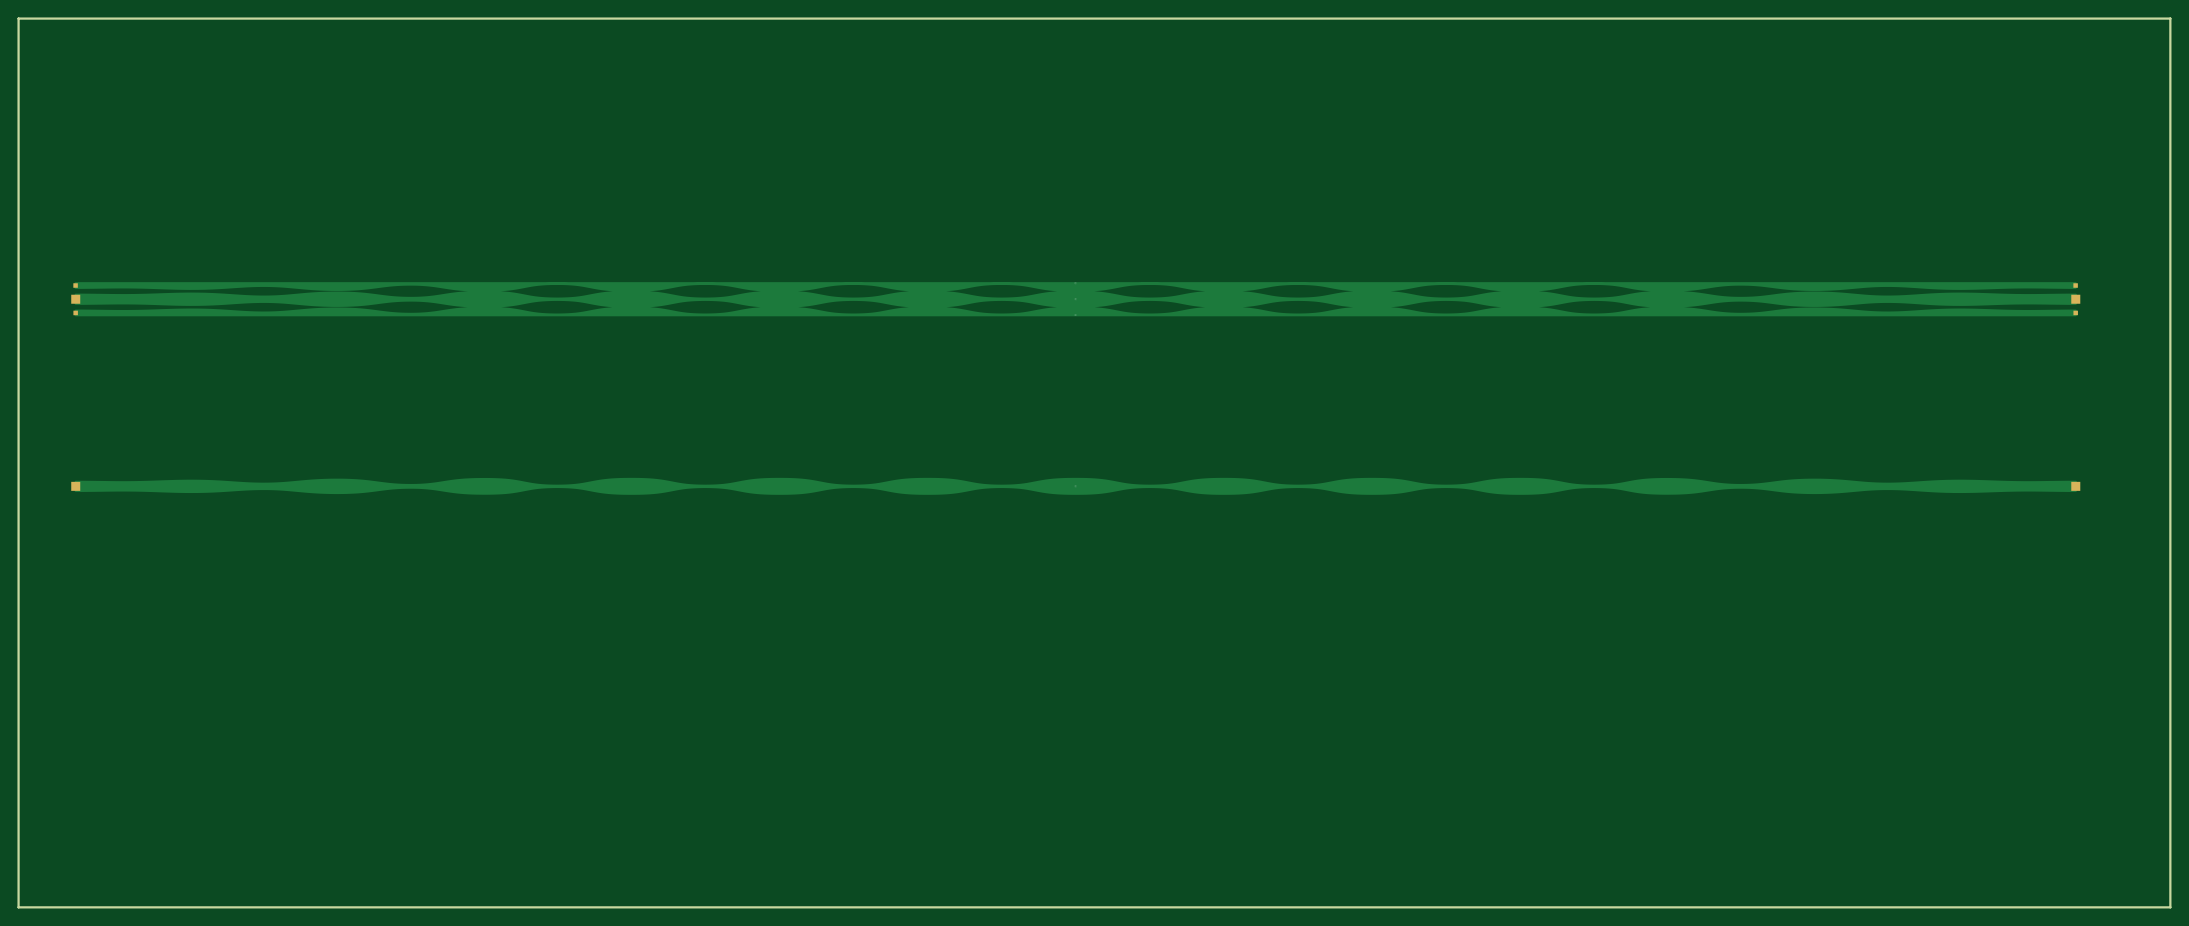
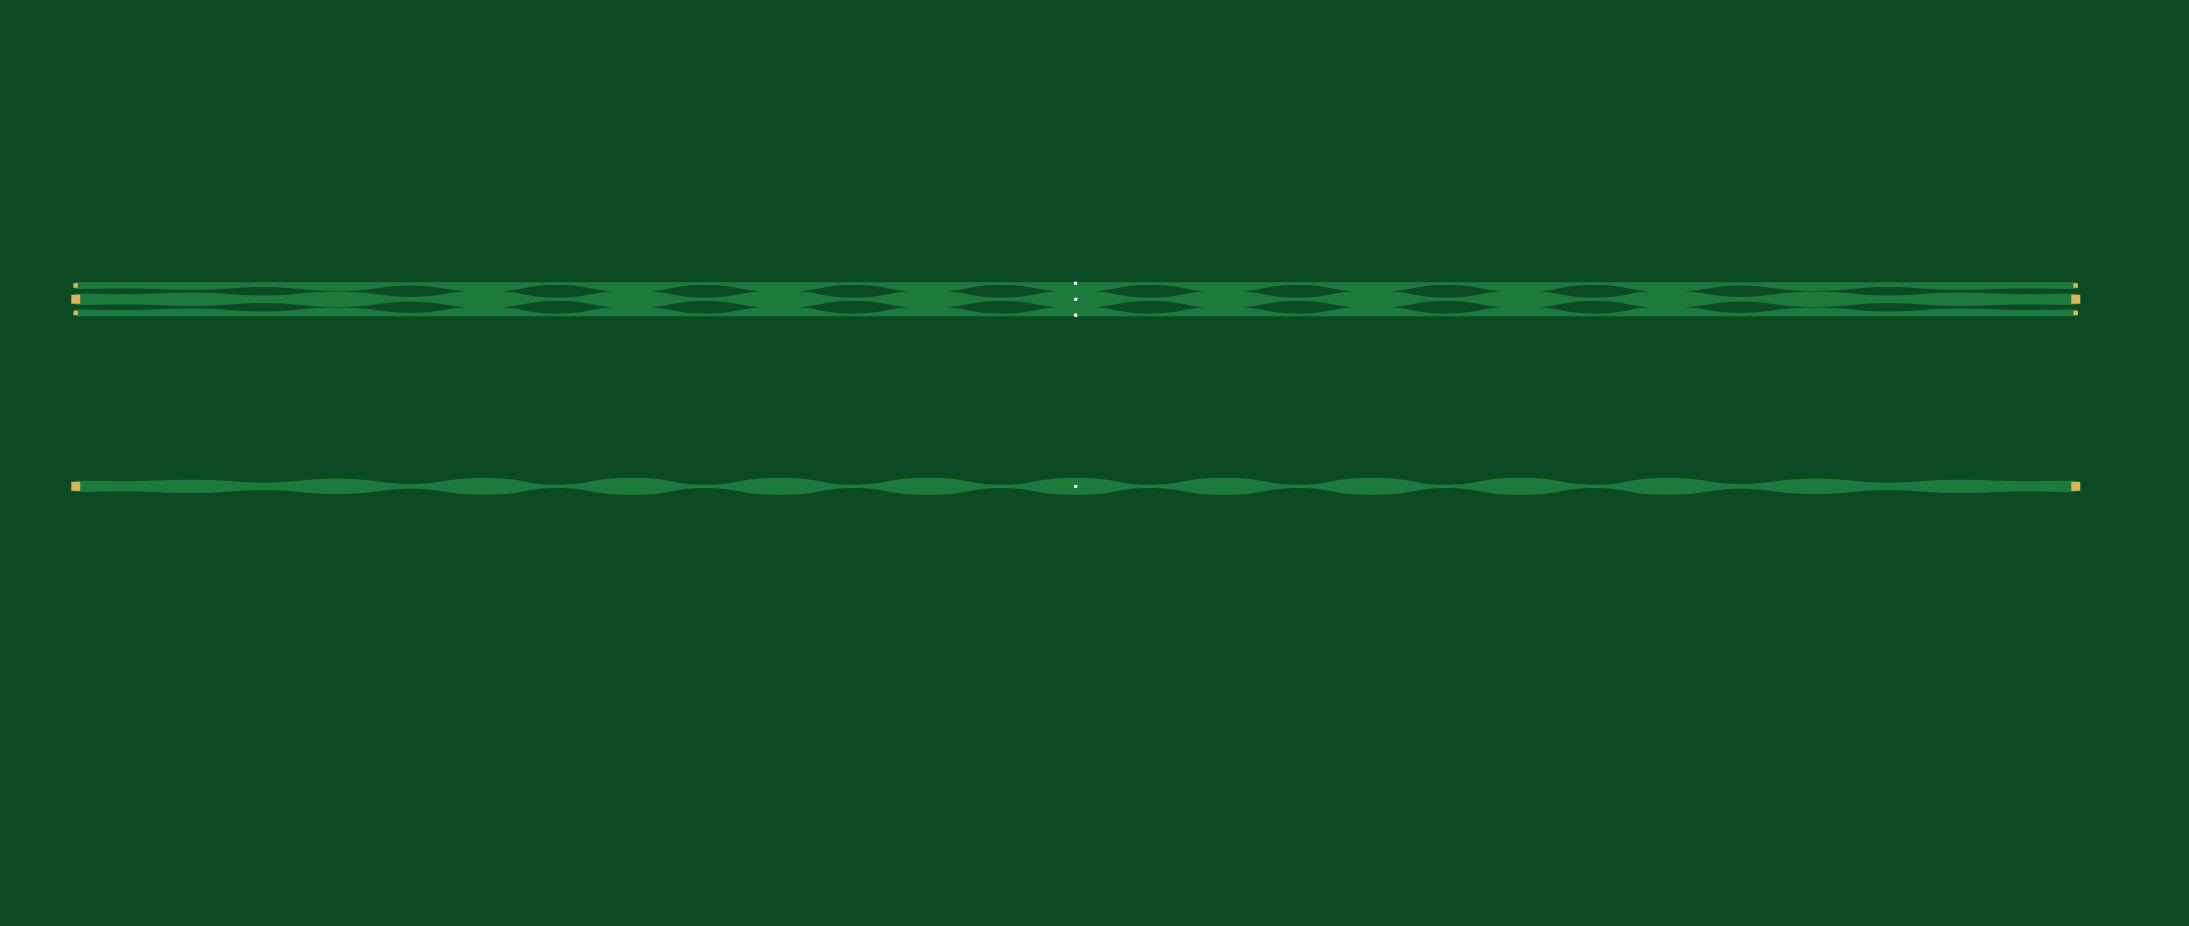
board edge: (18, 18) (18, 907) (2170, 907) (2170, 18) (18, 18) -> none

